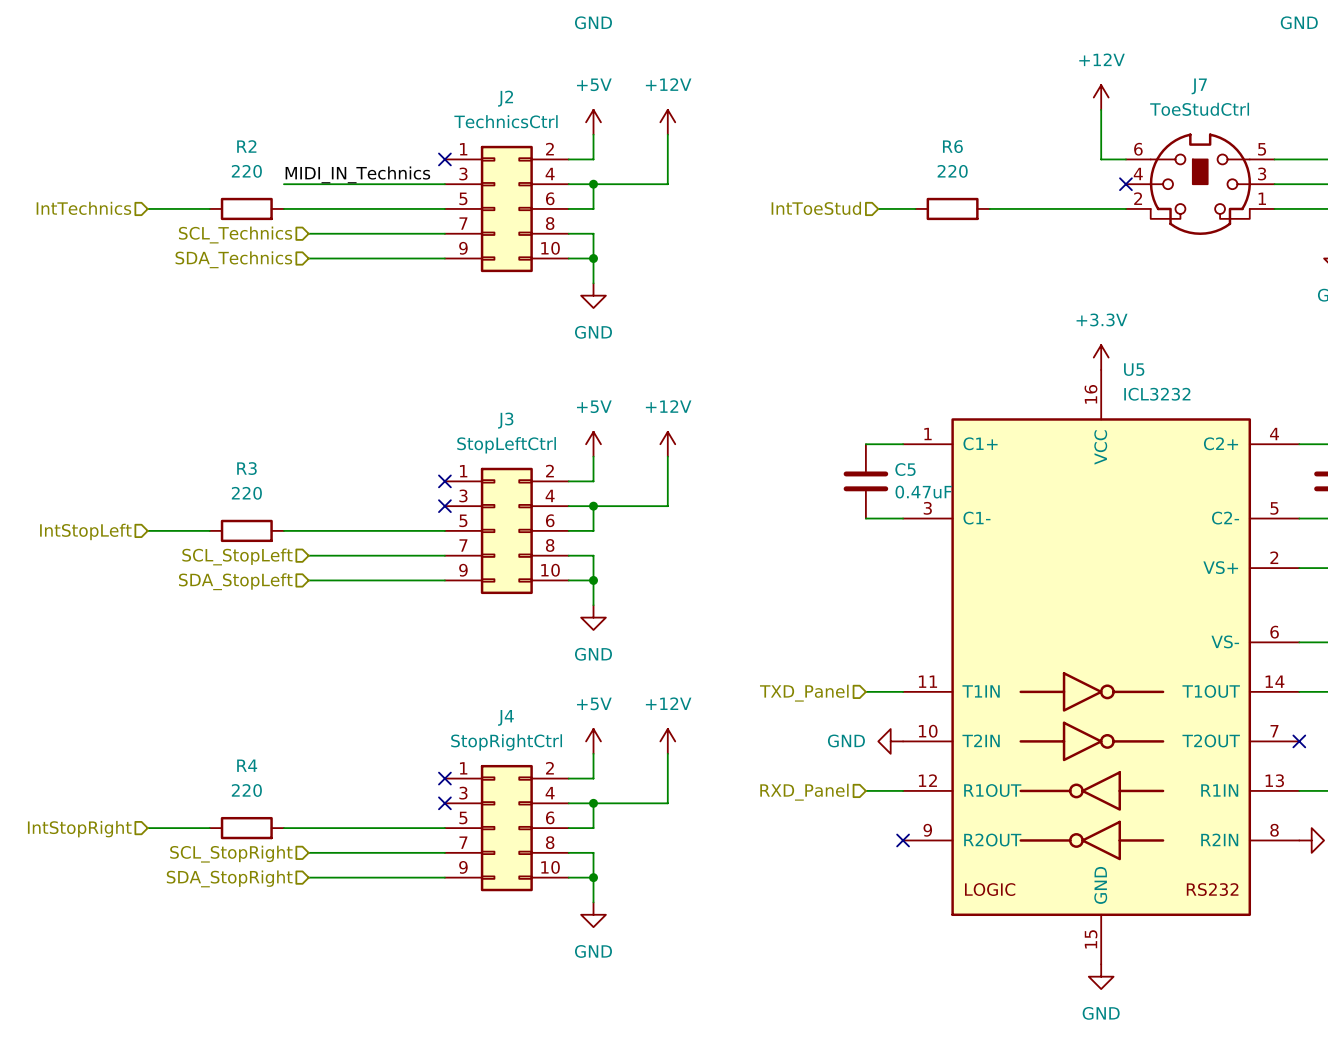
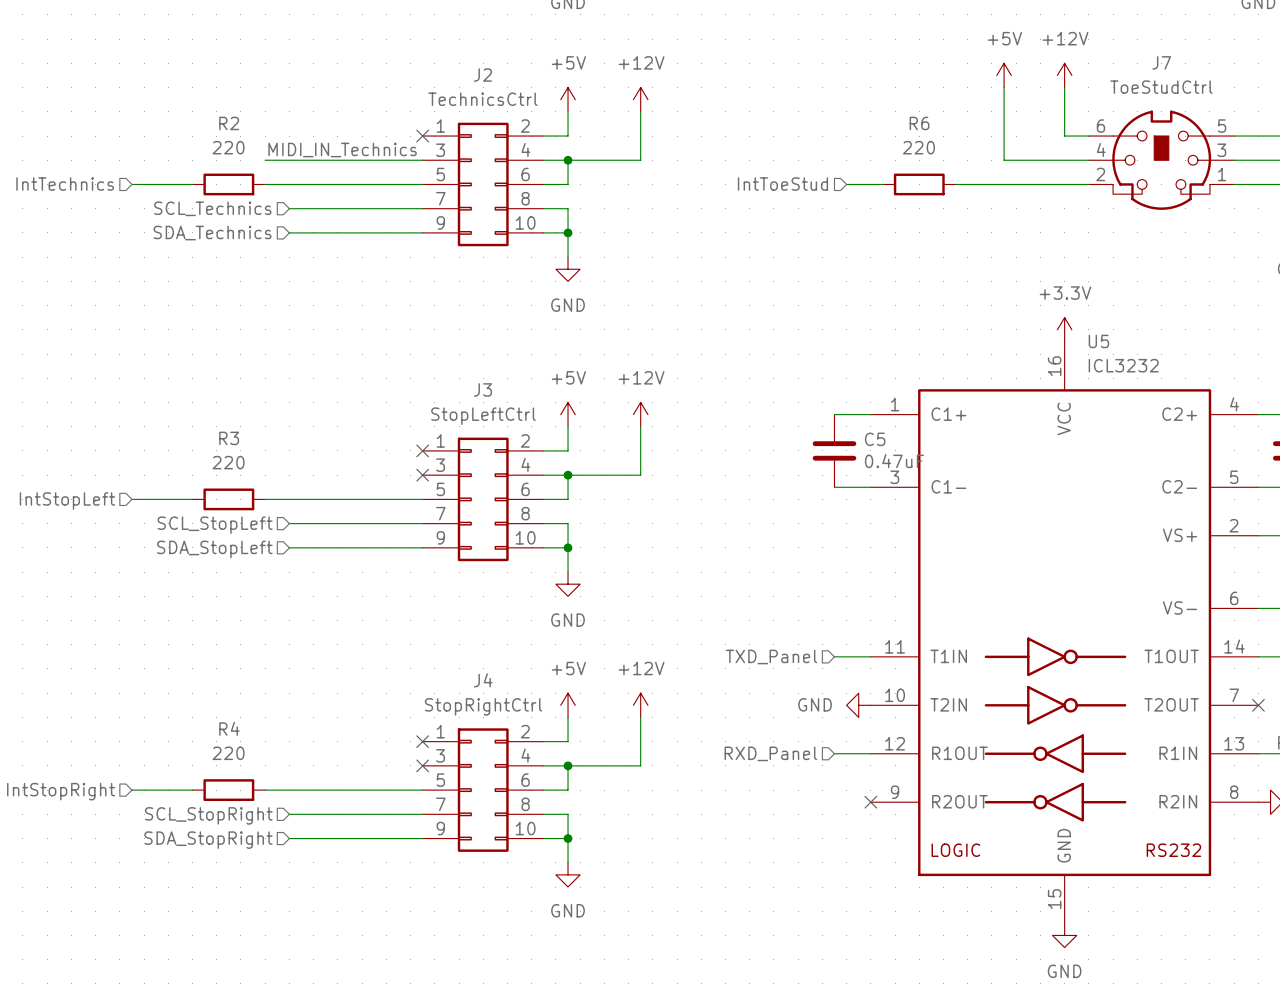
power symbol: none -> +5V (1004, 75)
wire: none -> (1004, 87) (1004, 160) (1088, 160)
no-connect mark: (1125, 184) -> none

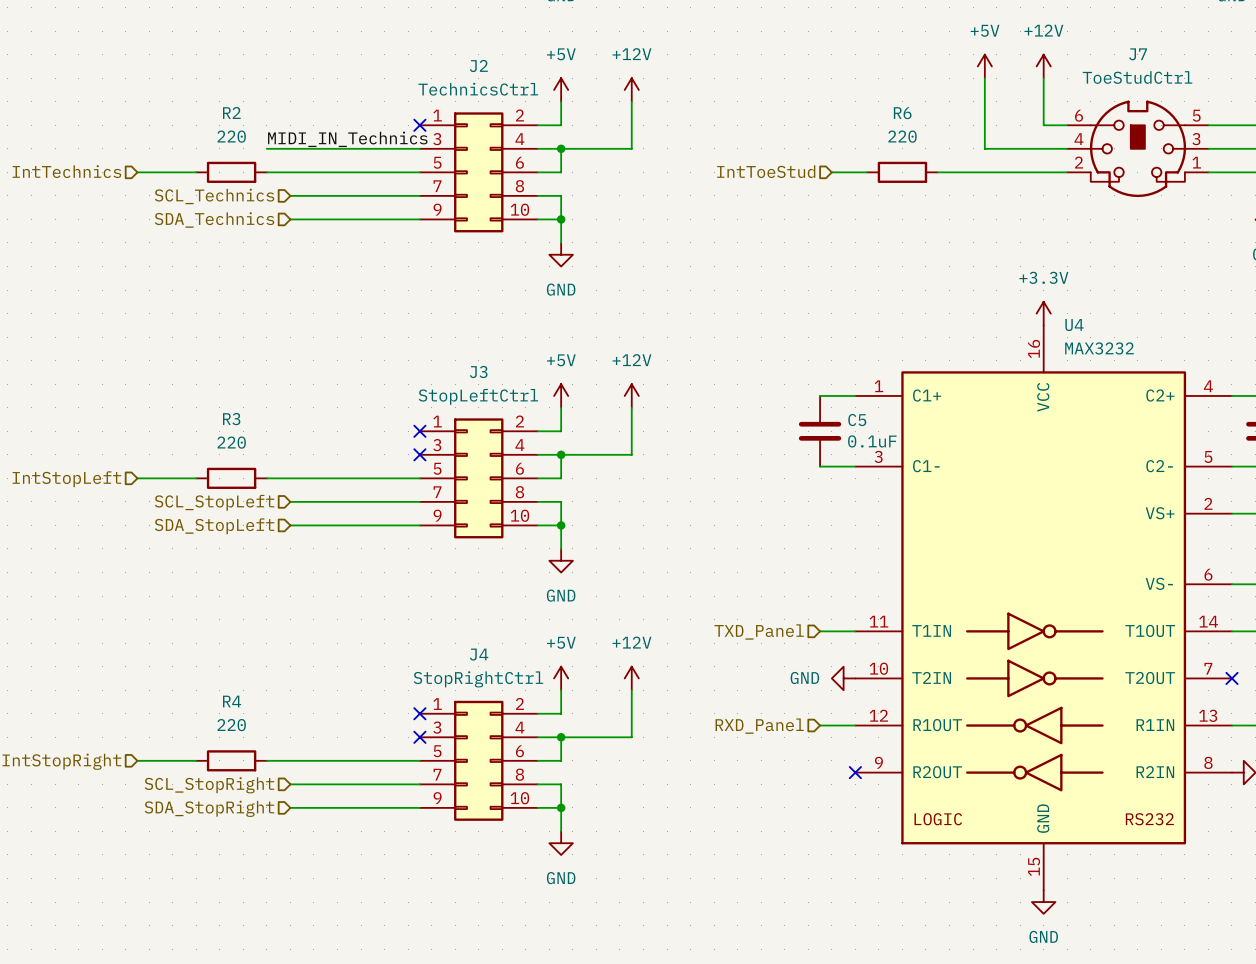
U5 name: U5 (1098, 341) -> U4 (1074, 325)
U5 value: ICL3232 (1123, 365) -> MAX3232 (1099, 348)
C5 value: 0.47uF (894, 461) -> 0.1uF (872, 441)

